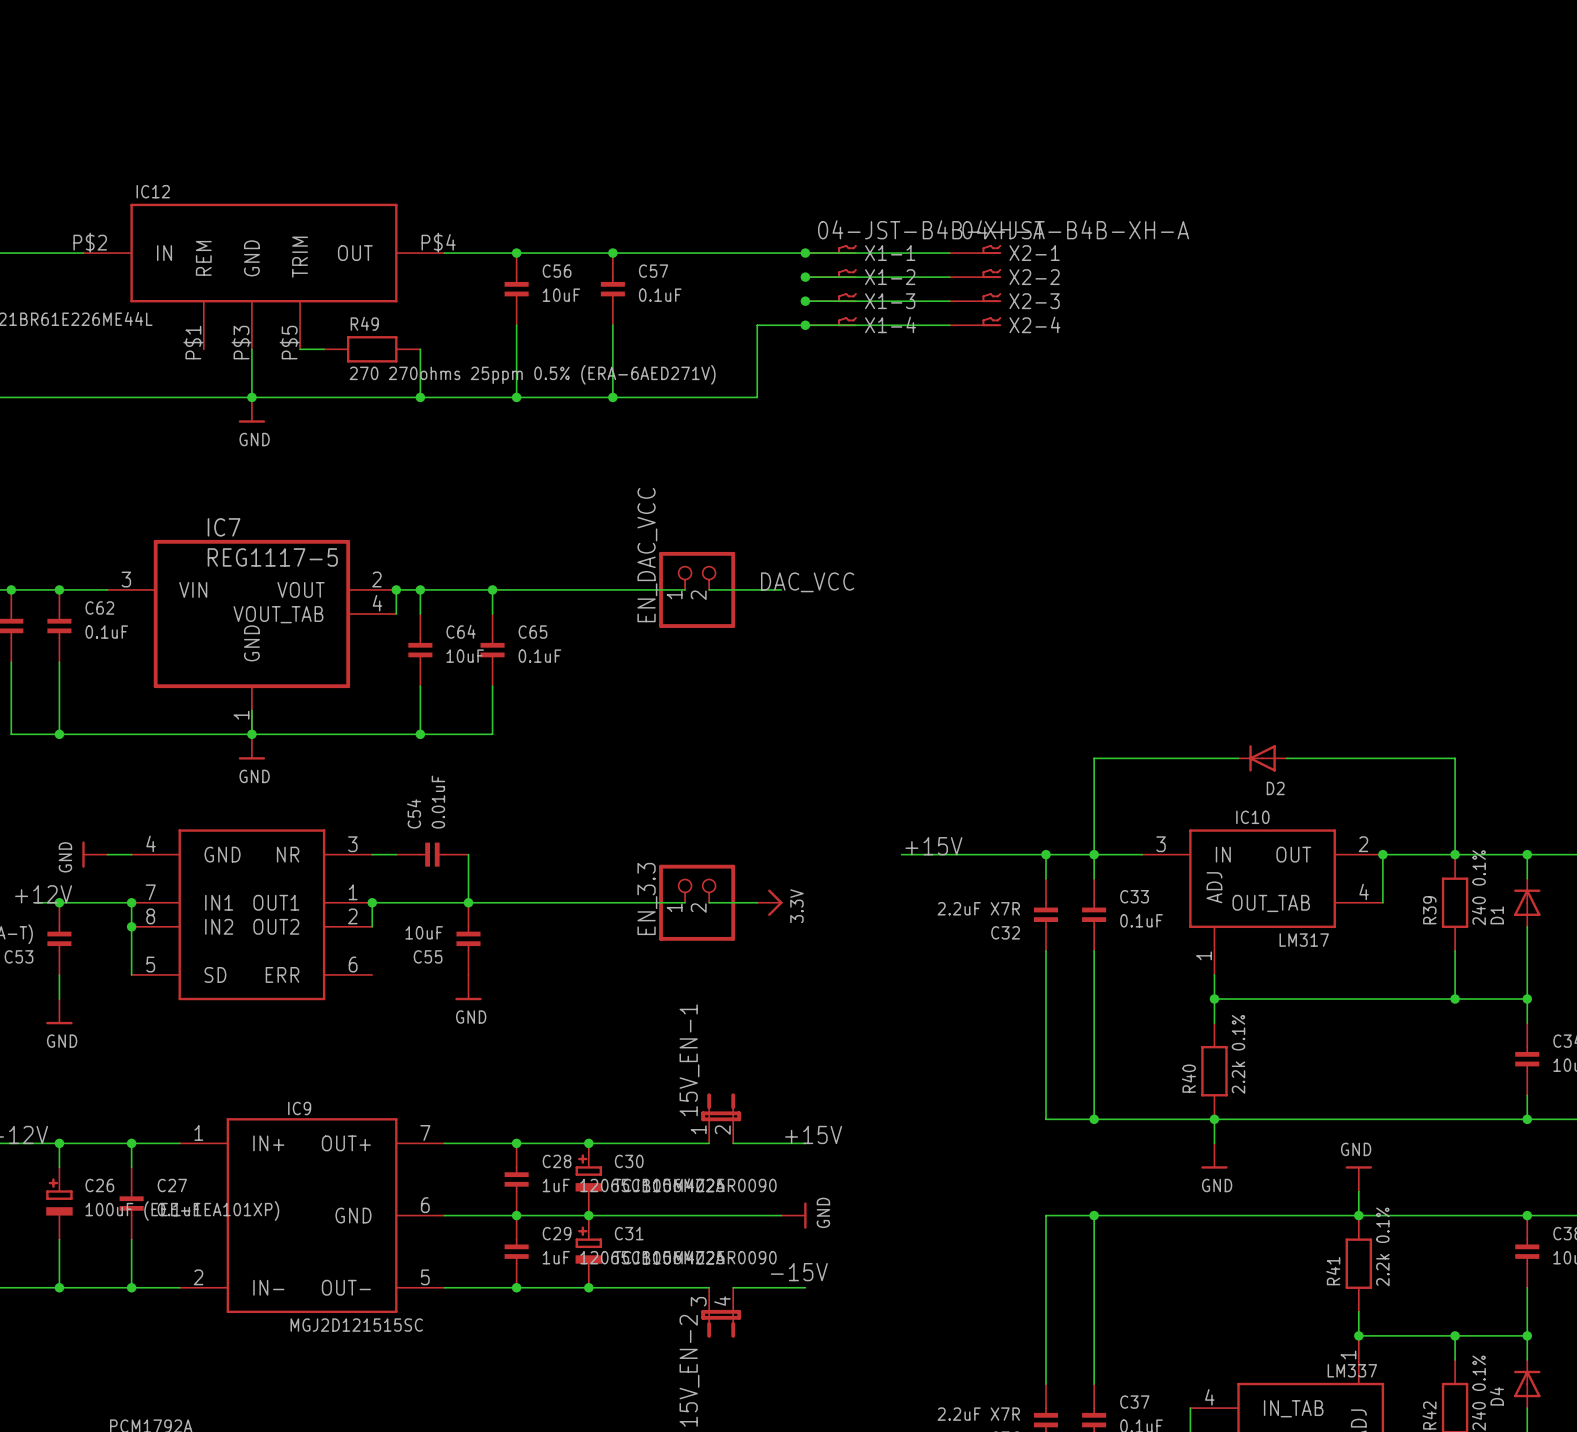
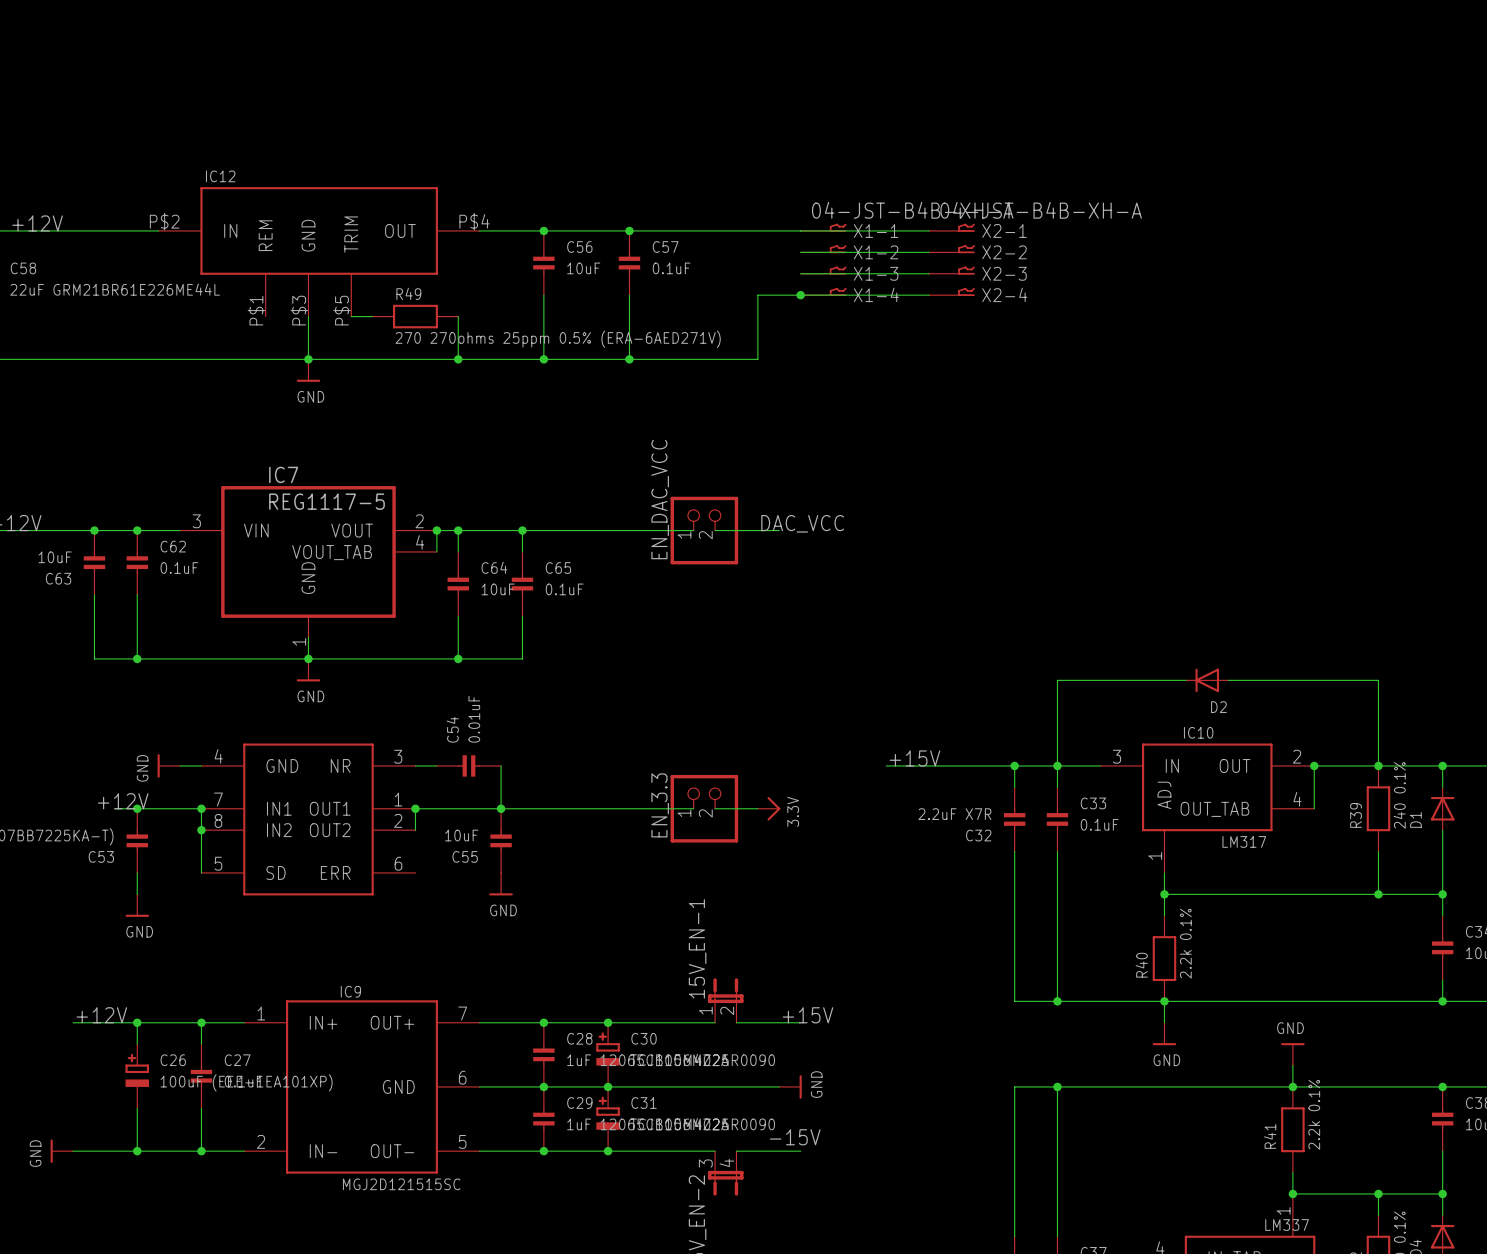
junction: (805, 253) -> none
junction: (805, 277) -> none
junction: (805, 301) -> none

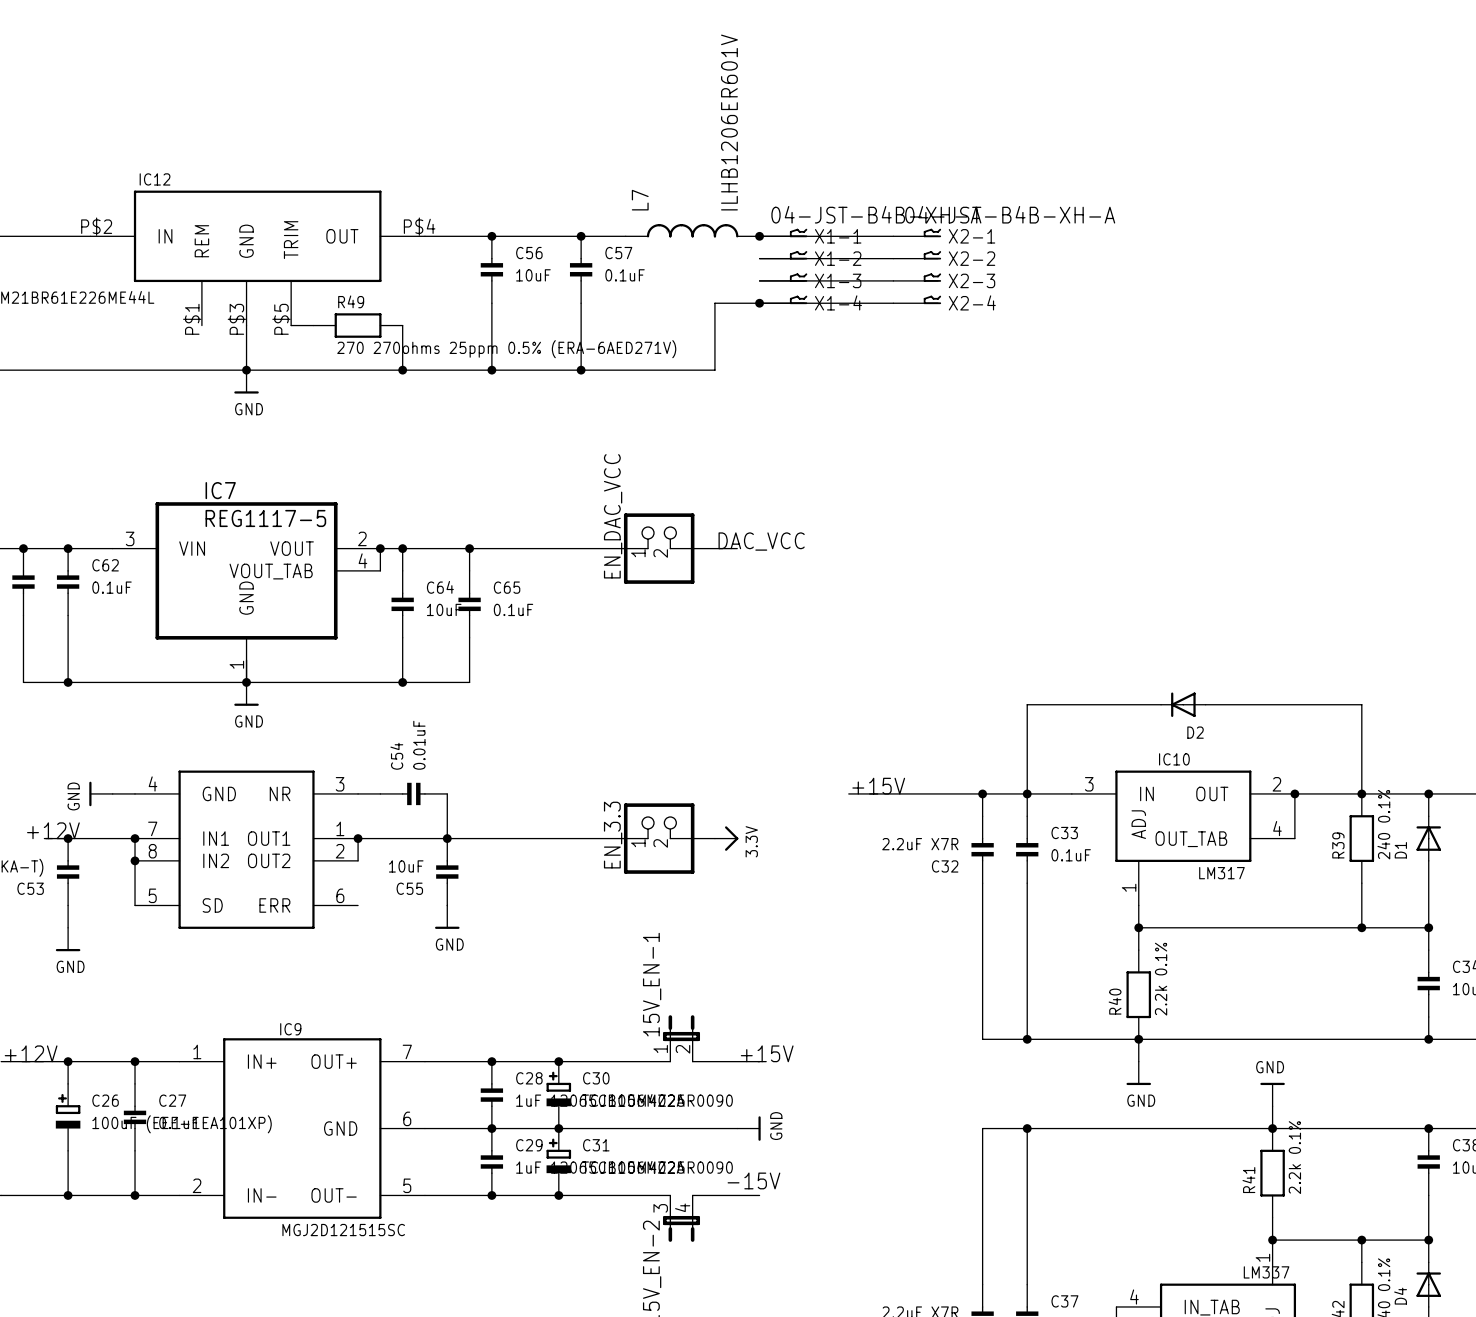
L7: none -> ILHB1206ER601V (692, 230)
wire: (672, 230) (800, 230) -> none
junction: none -> (759, 236)

